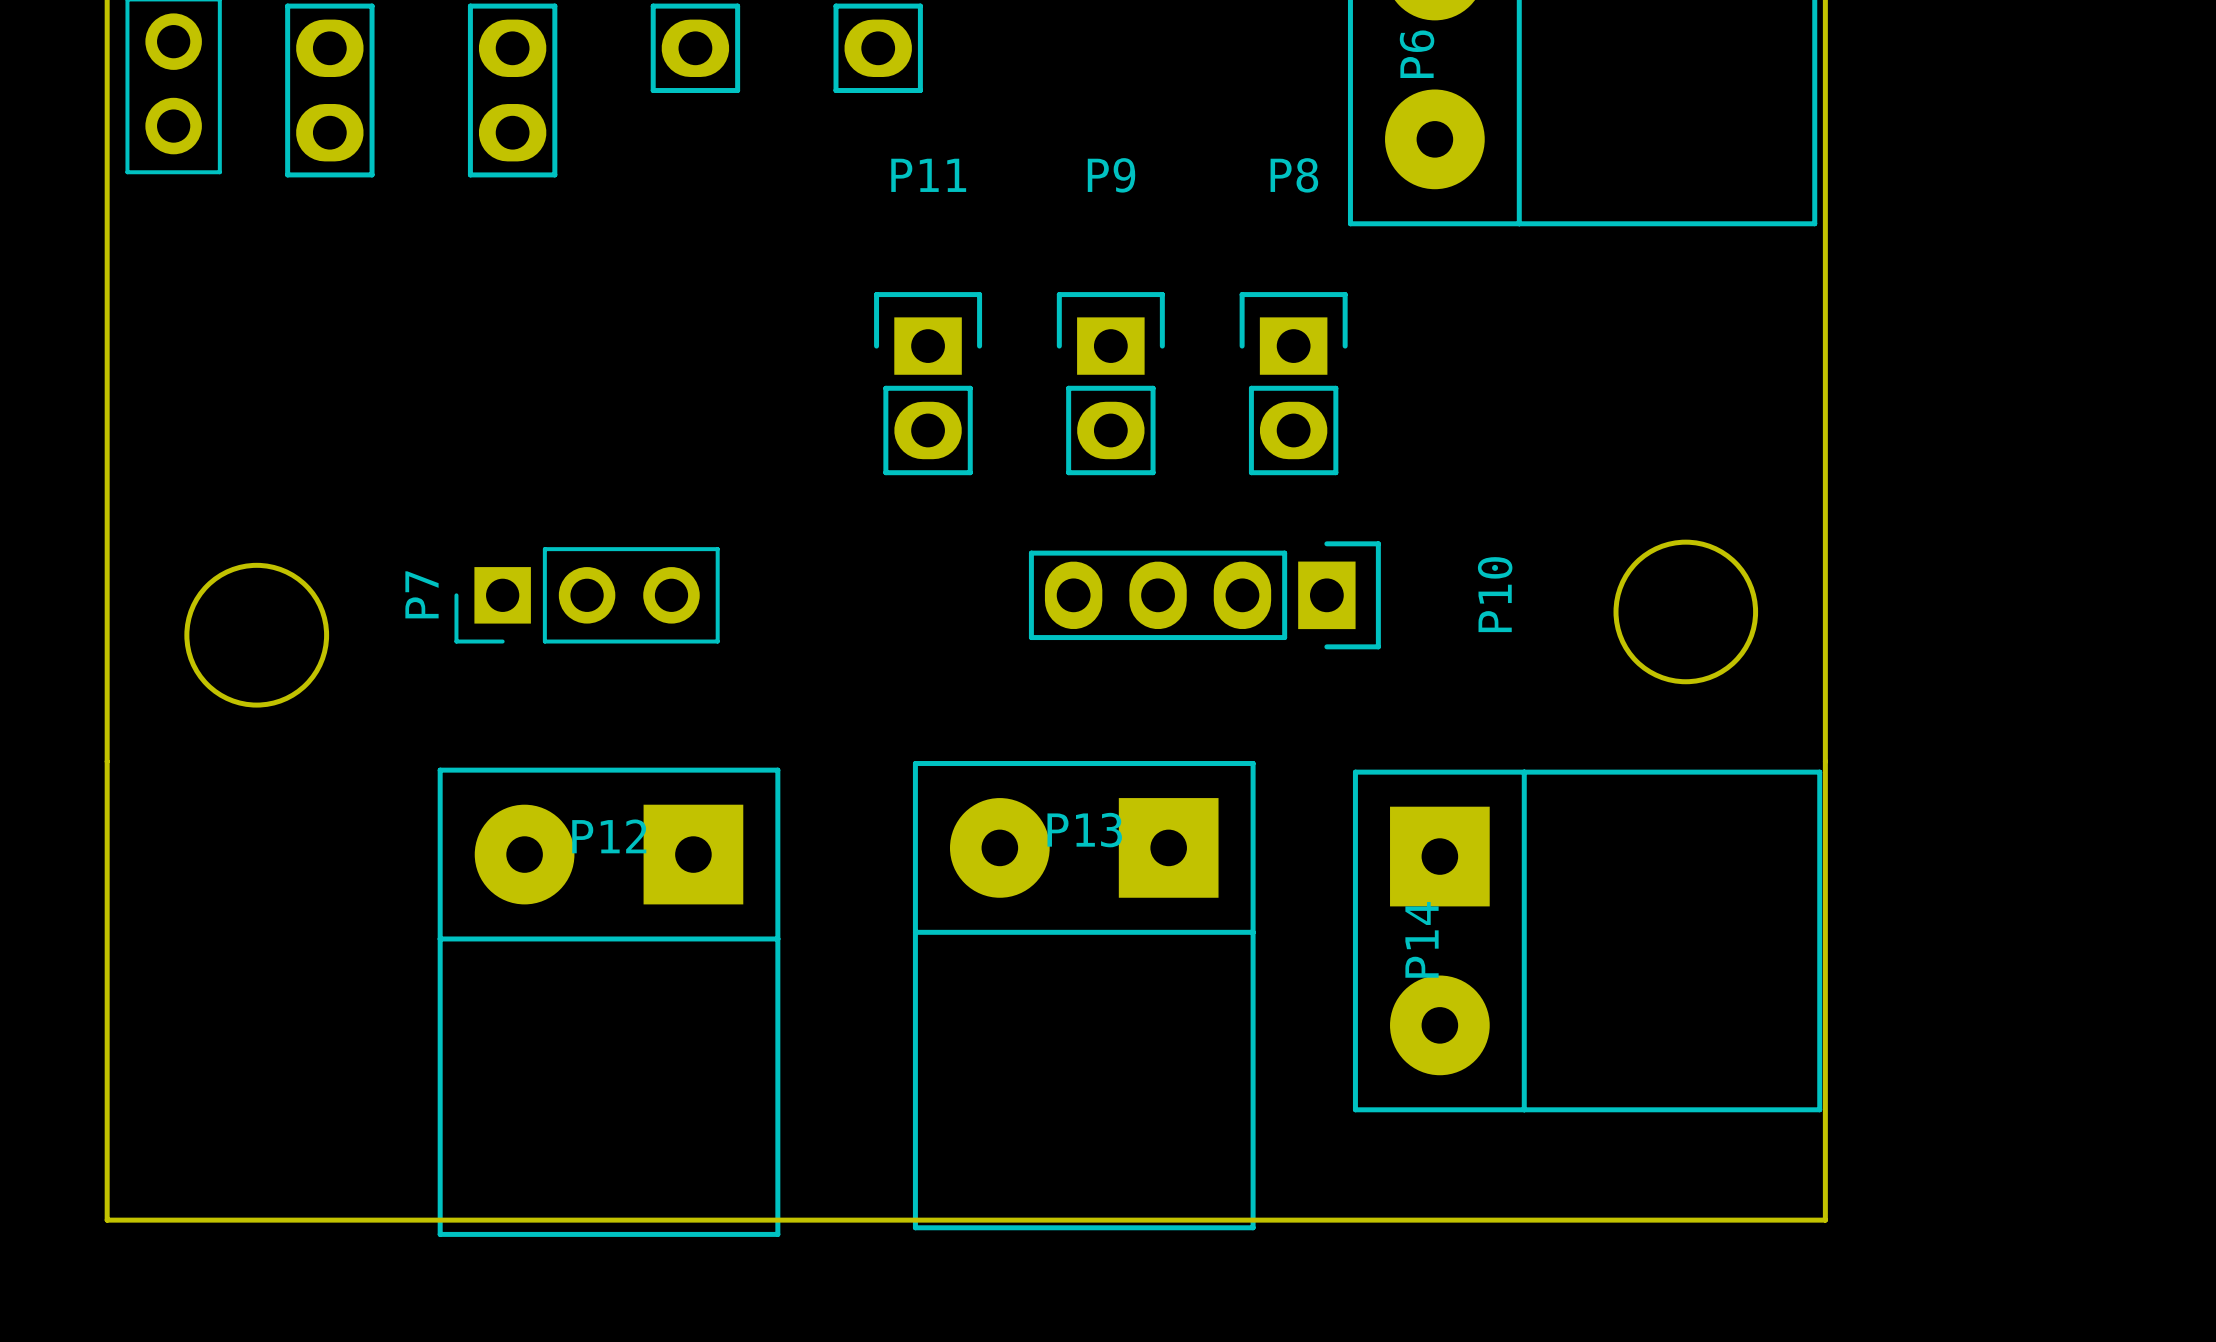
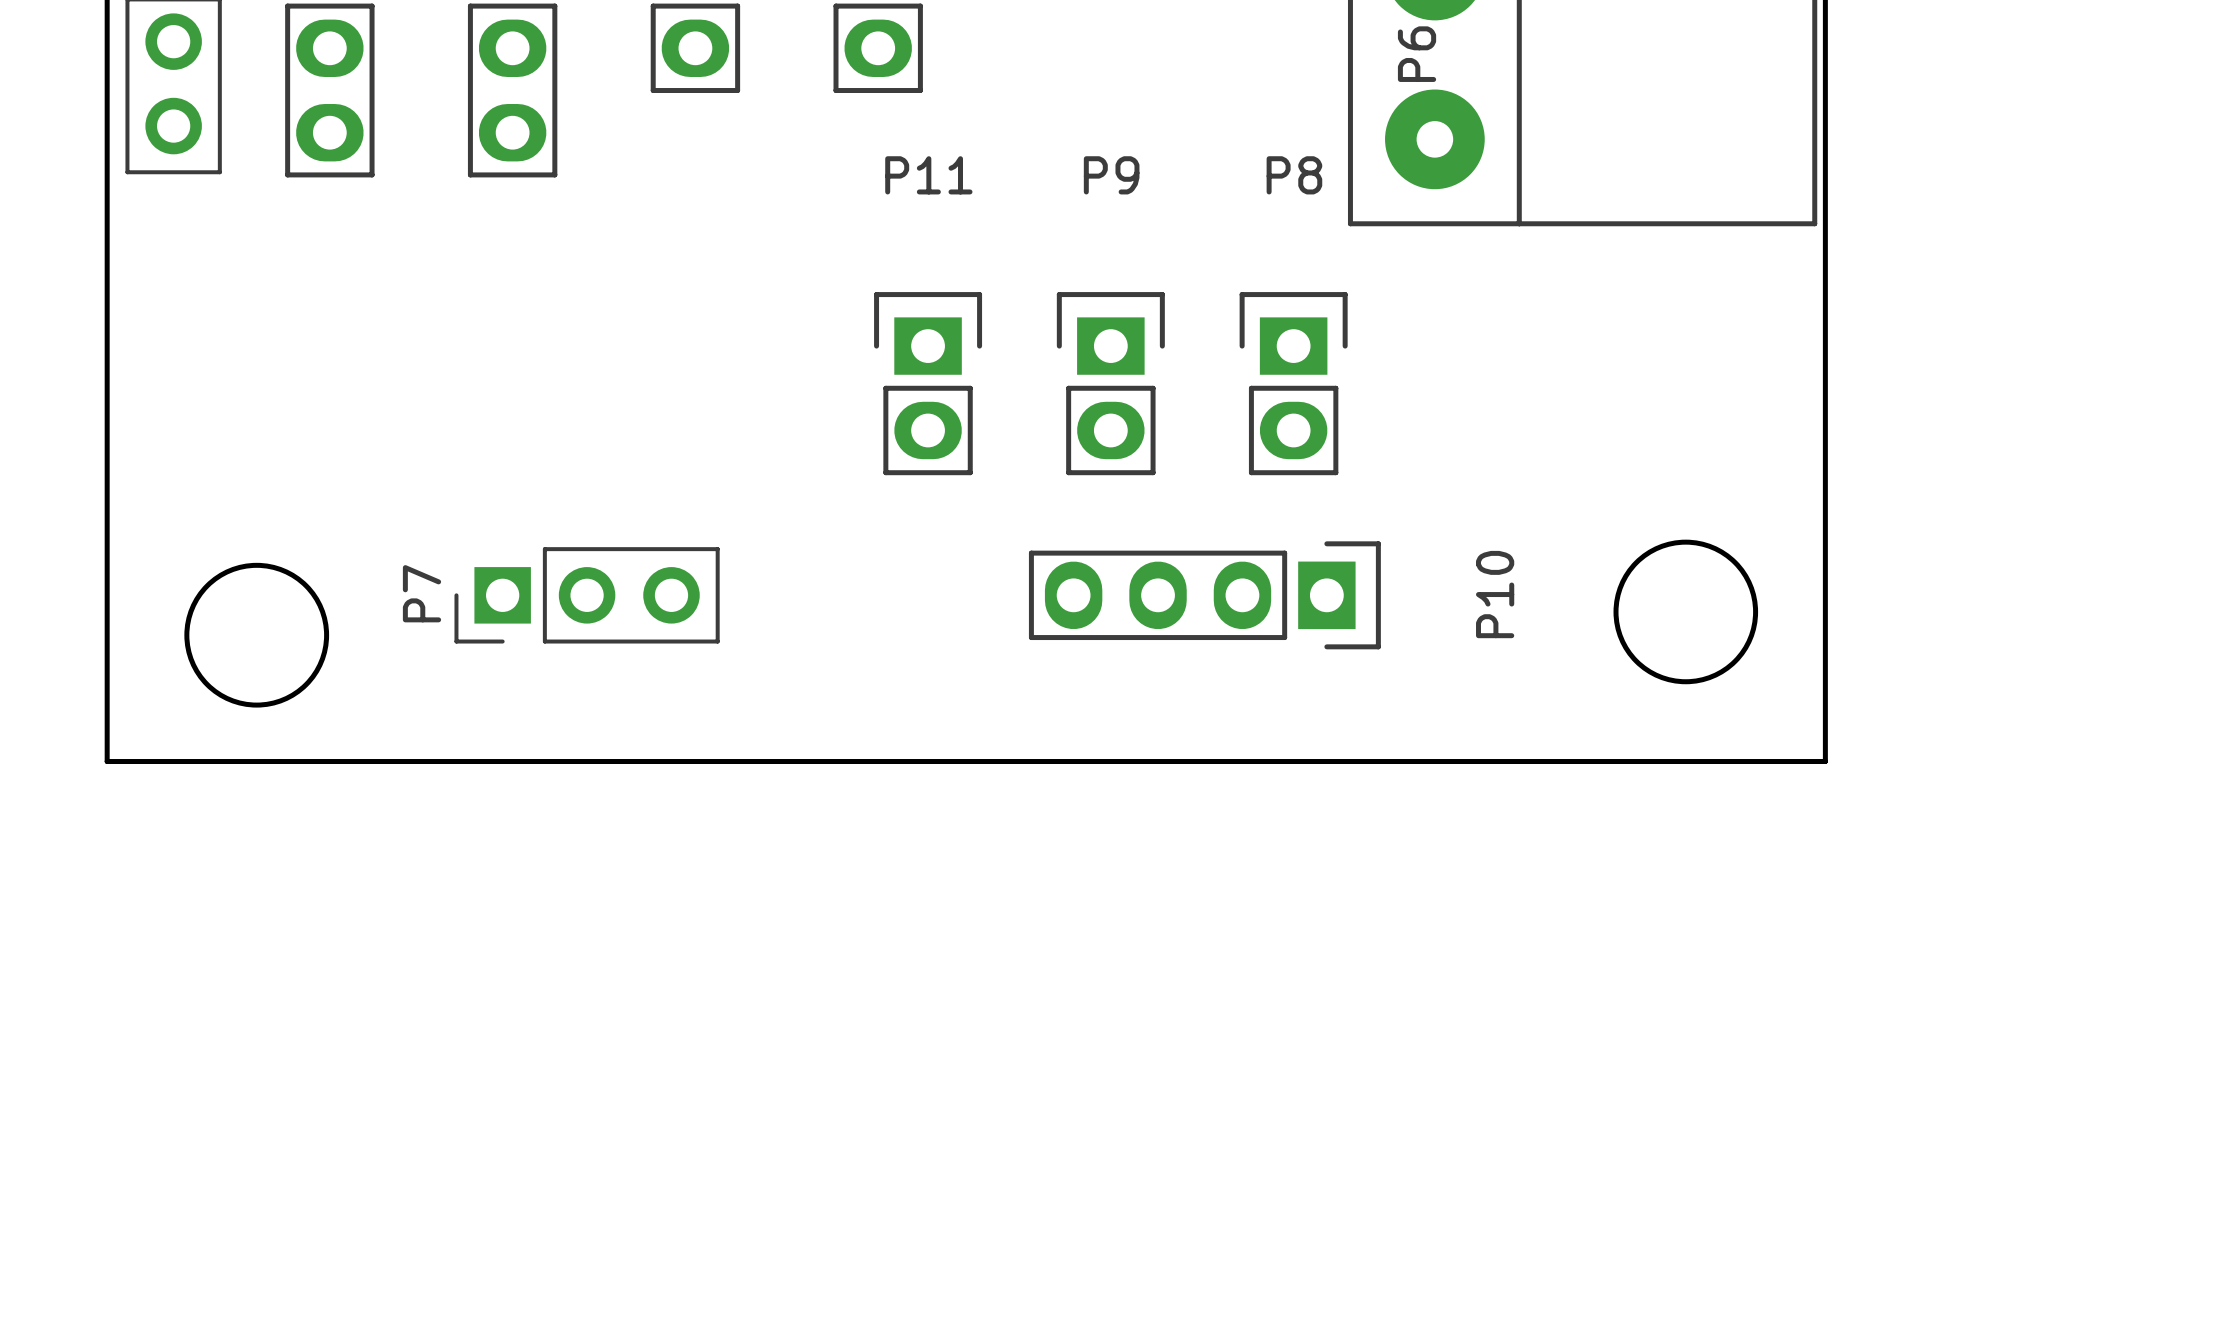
board edge: (107, 761) (107, 1220) (1825, 1220) (1825, 761) -> (107, 761) (1825, 761)
P14: (1587, 940) -> none
P13: (1084, 995) -> none
P12: (609, 1002) -> none

